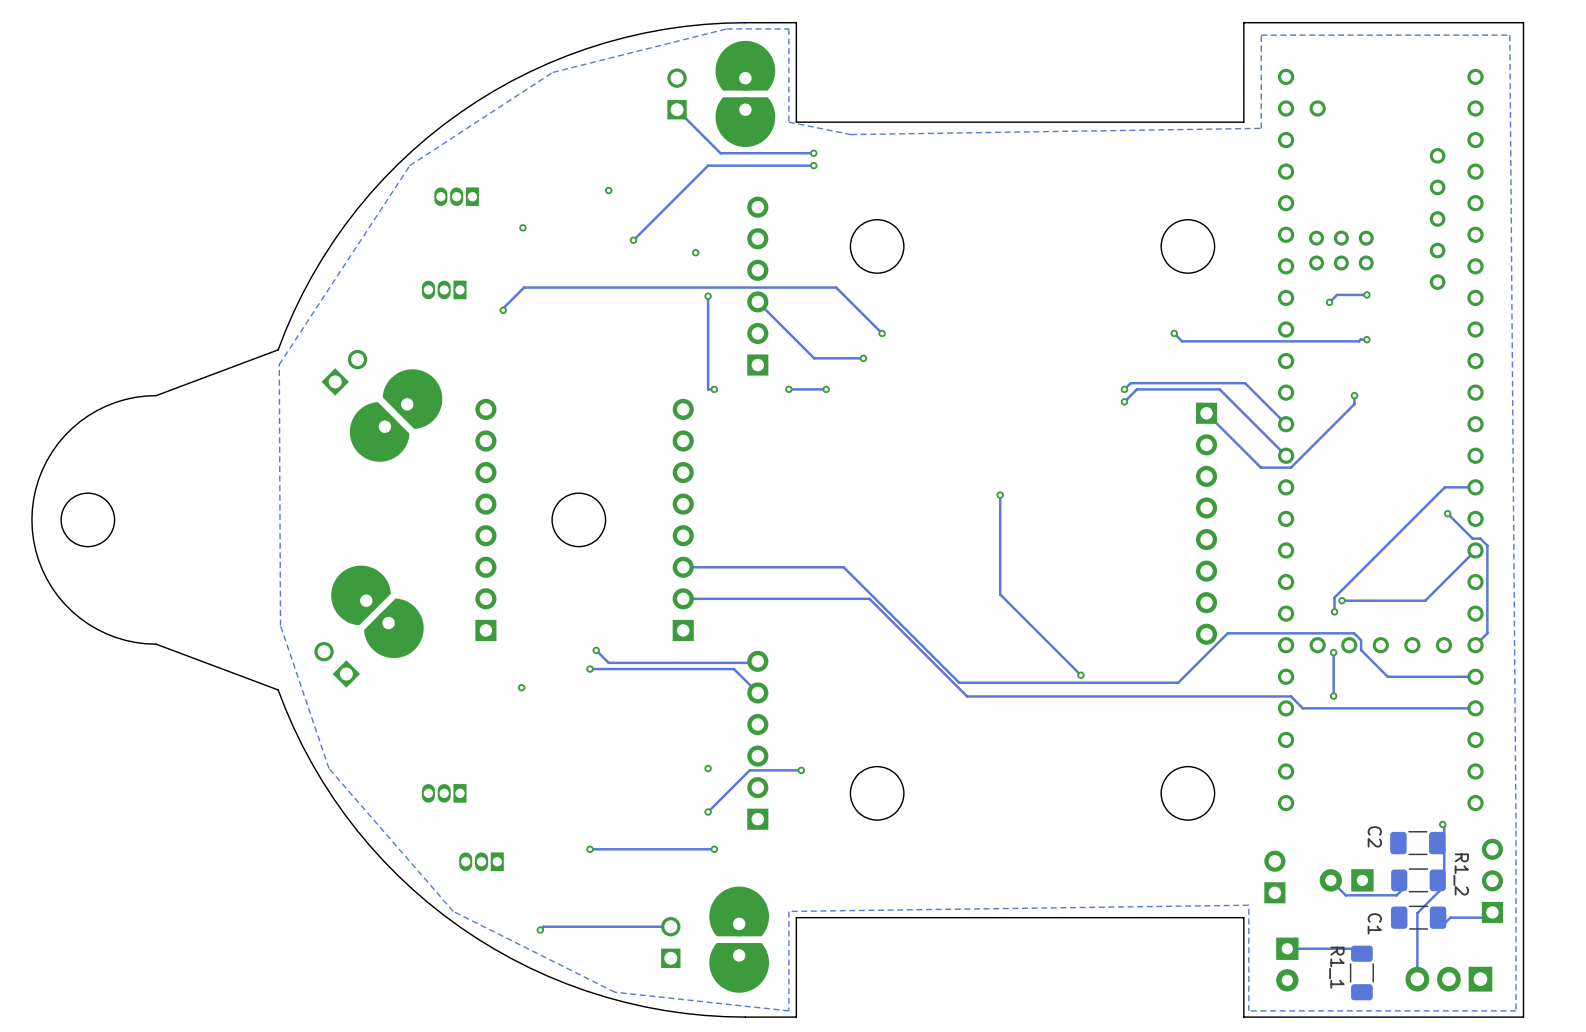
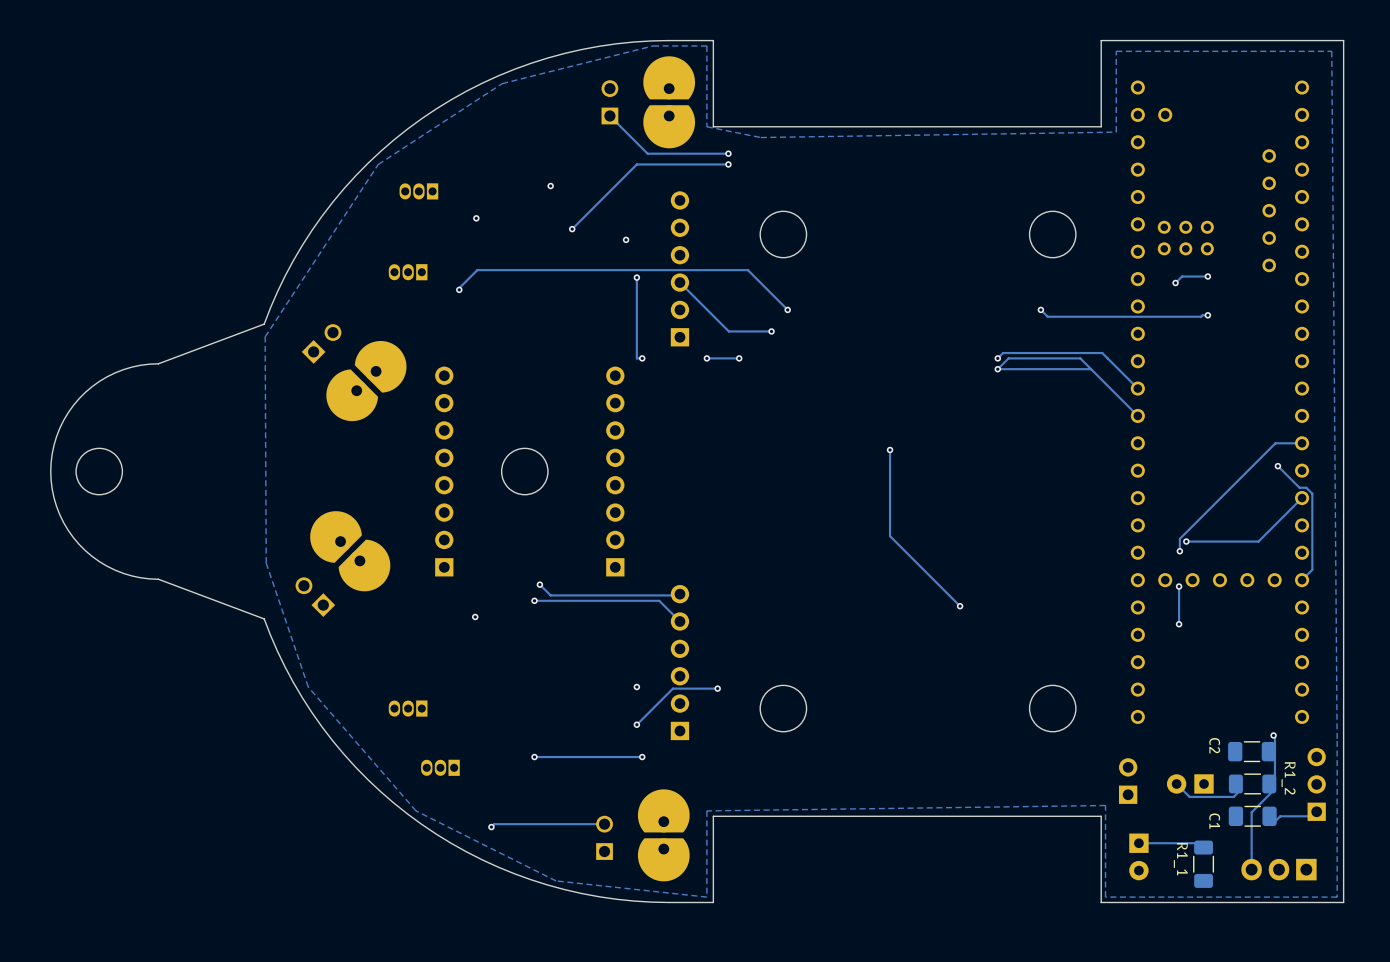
track: (1354, 395) (1354, 404) (1291, 467) (1260, 467) (1206, 413) -> none
via: (1354, 395) -> none
track: none -> (1091, 369) (997, 369)
part: (1206, 523) -> none
track: (683, 567) (843, 567) (959, 682) (1178, 682) (1227, 633) (1354, 633) (1361, 640) (1361, 650) (1387, 676) (1475, 676) -> none
track: (683, 598) (869, 598) (967, 696) (1291, 696) (1302, 708) (1475, 708) -> none

